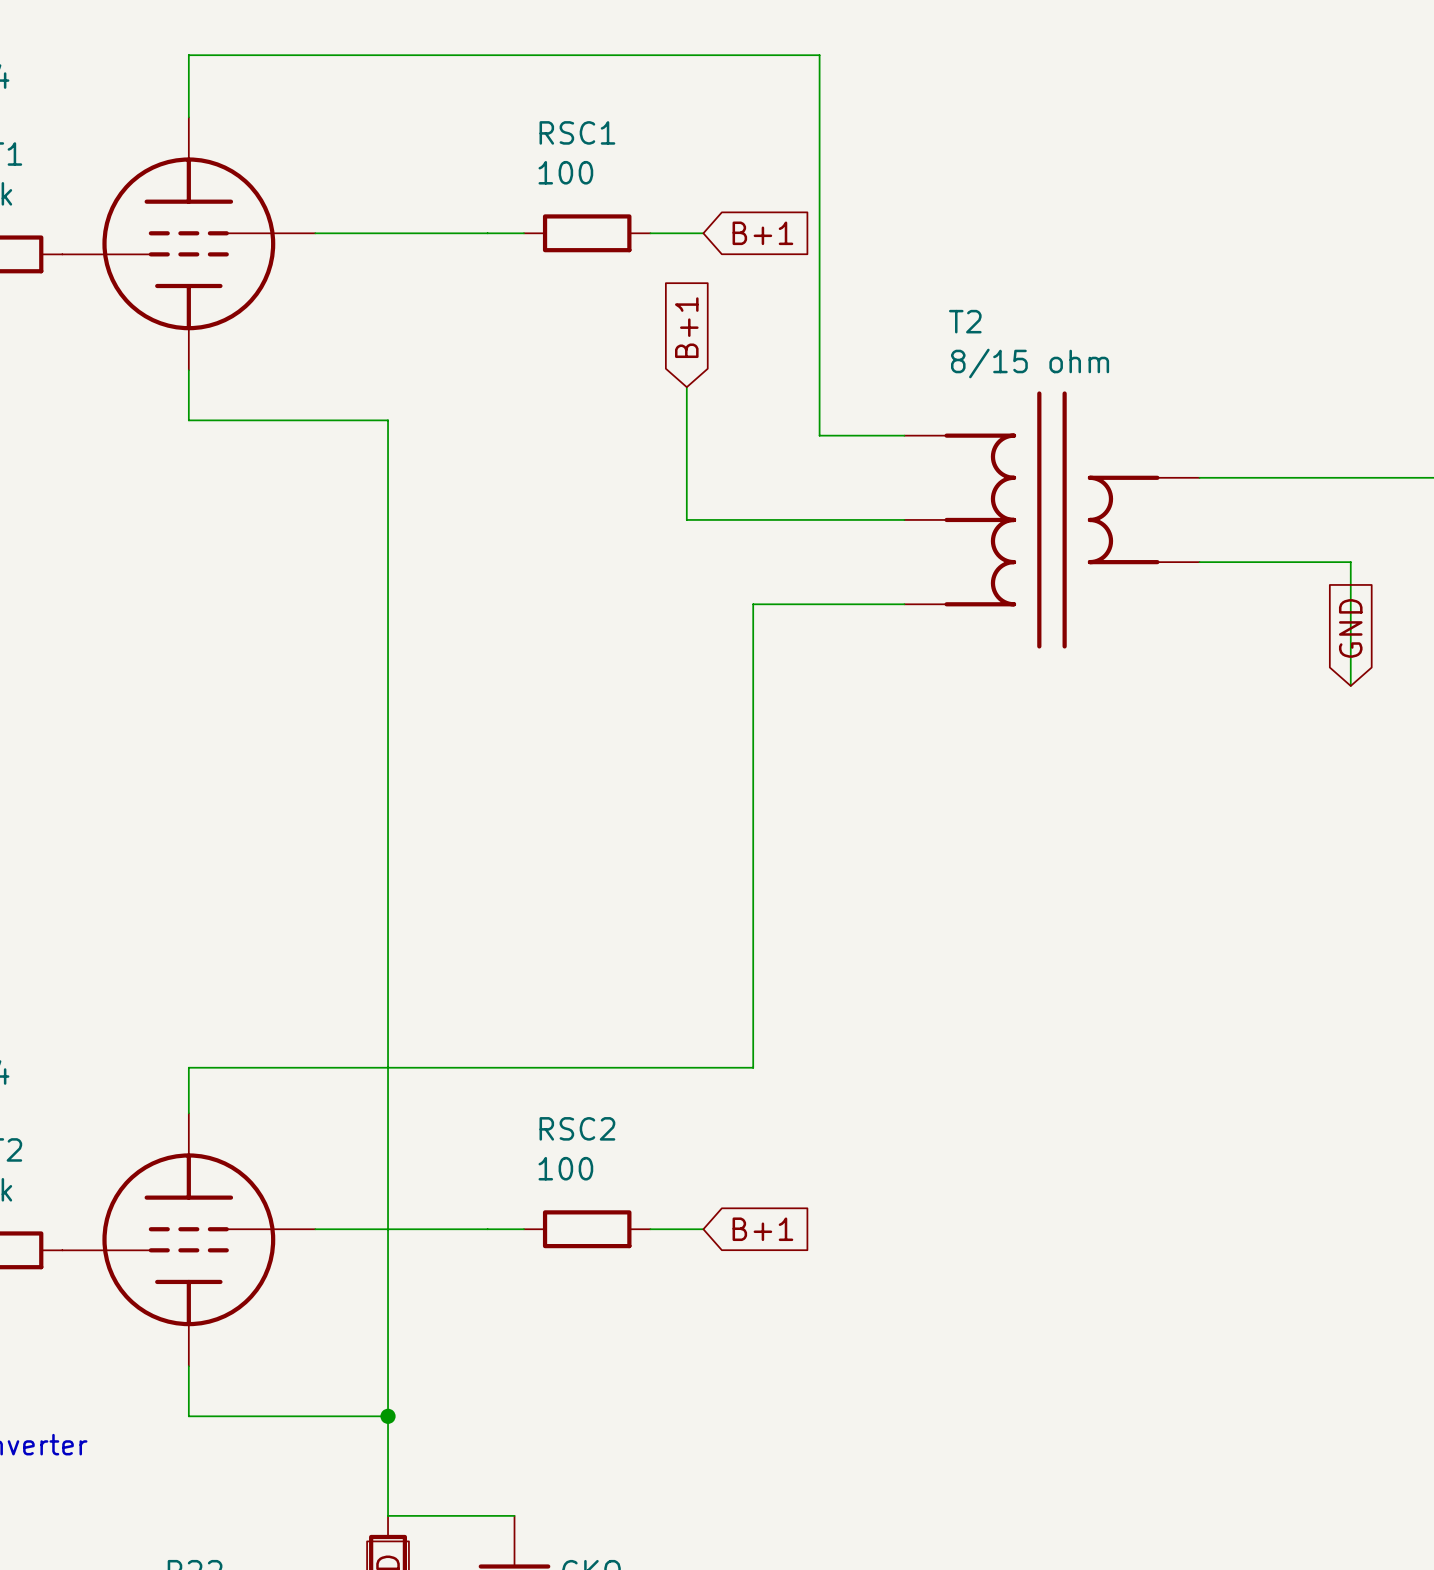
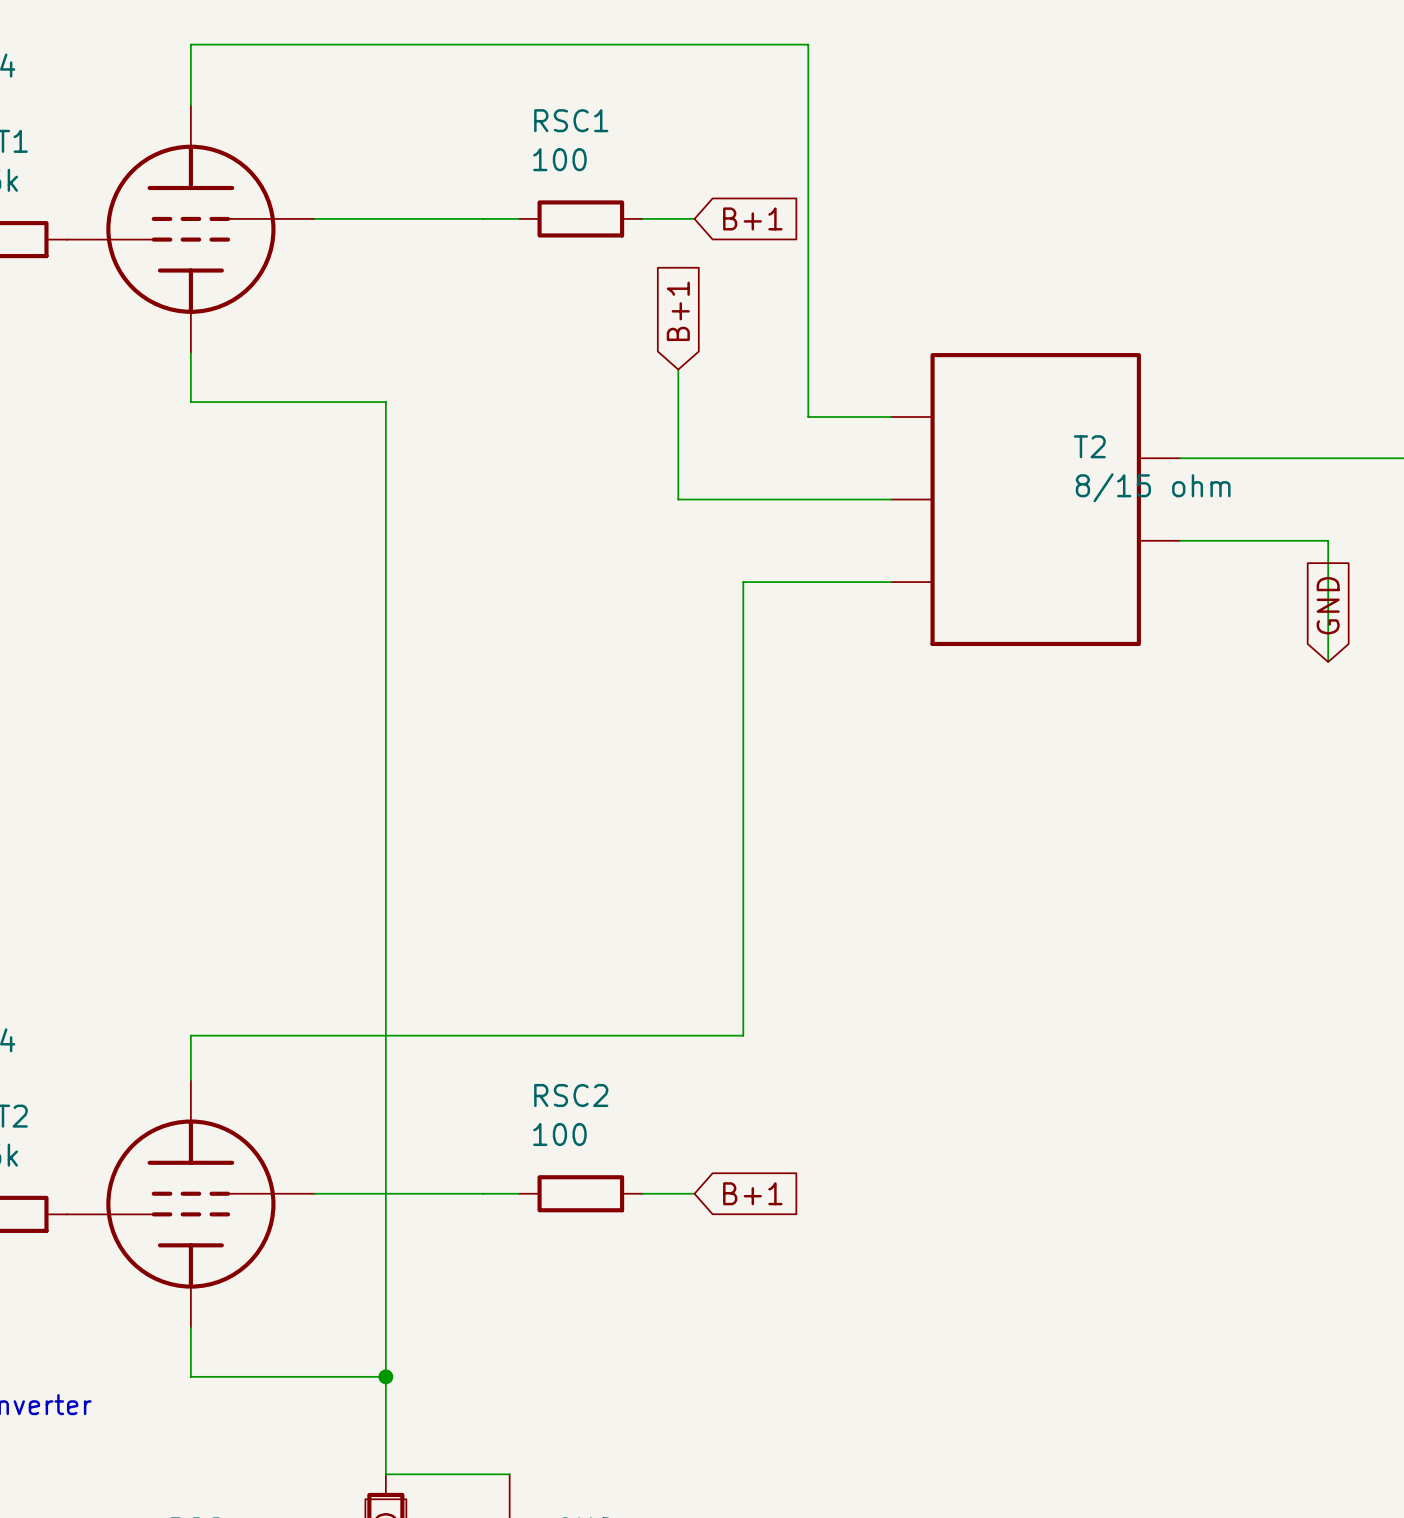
T2 name position: T2 (965, 321) -> T2 (1089, 446)
T2 value position: 8/15 ohm (1030, 363) -> 8/15 ohm (1153, 487)
T2 symbol: [904, 391, 1200, 649] -> [891, 353, 1181, 647]

